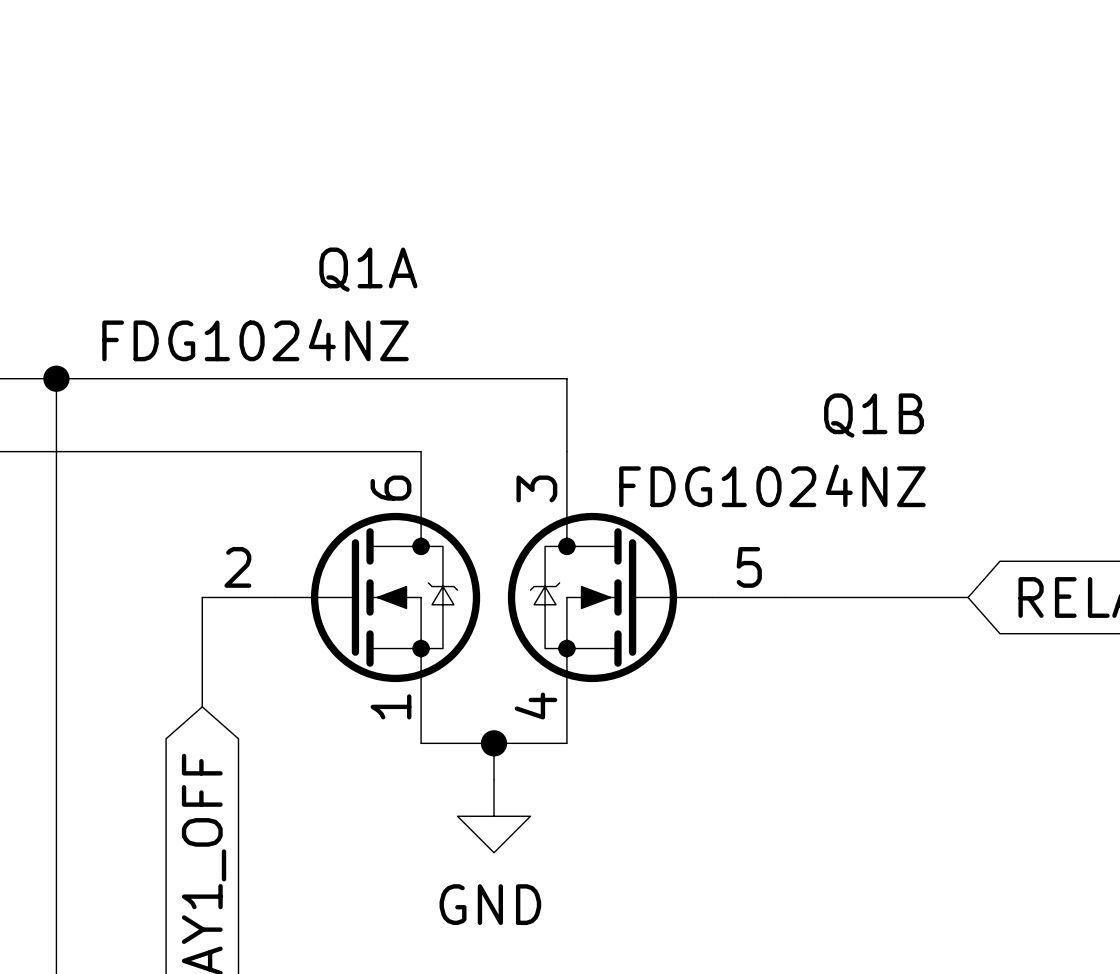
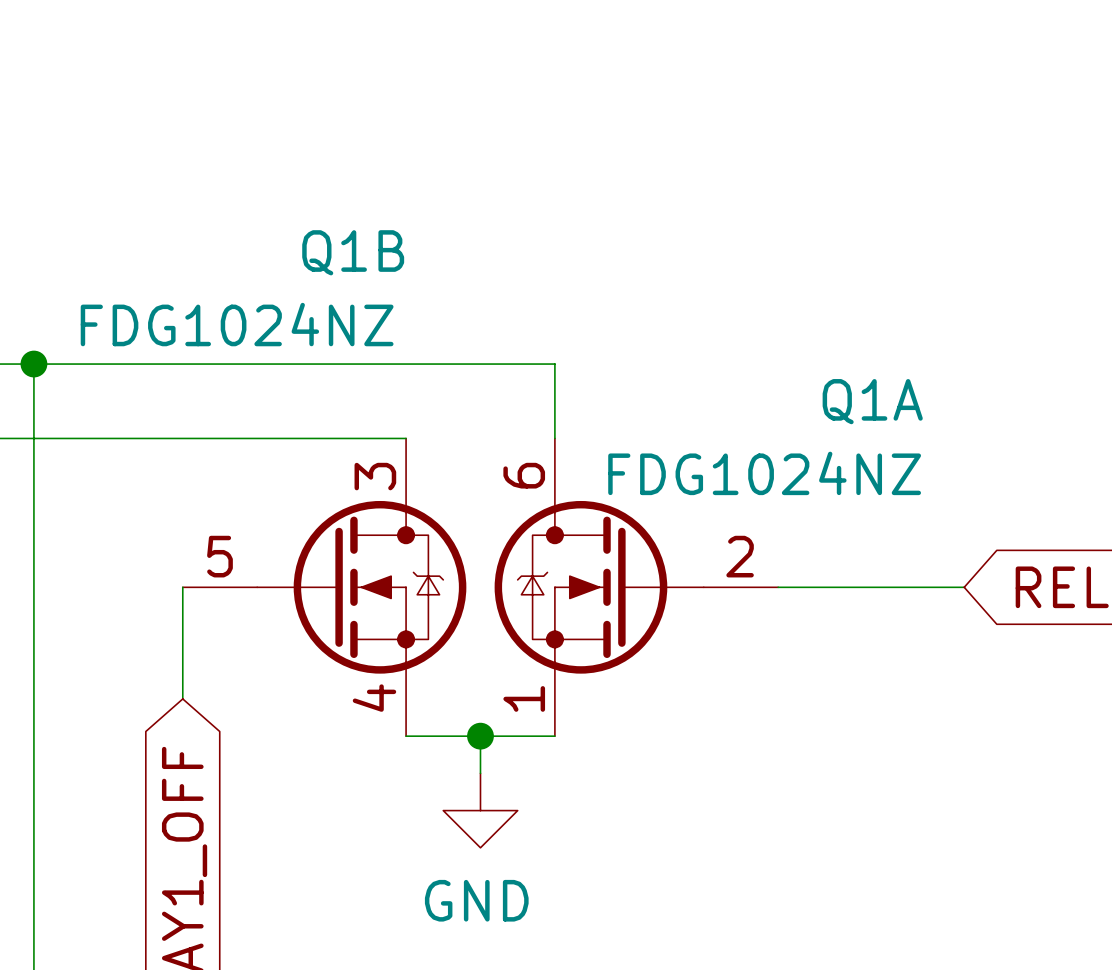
Q1A name position: Q1A (368, 269) -> Q1A (872, 401)
Q1B name position: Q1B (874, 415) -> Q1B (353, 252)
Q1A position: (341, 597) -> (636, 587)
Q1A flip: as is (377, 597) -> left-right (599, 587)
Q1B flip: as is (610, 597) -> left-right (361, 587)
Q1B position: (646, 597) -> (324, 587)

